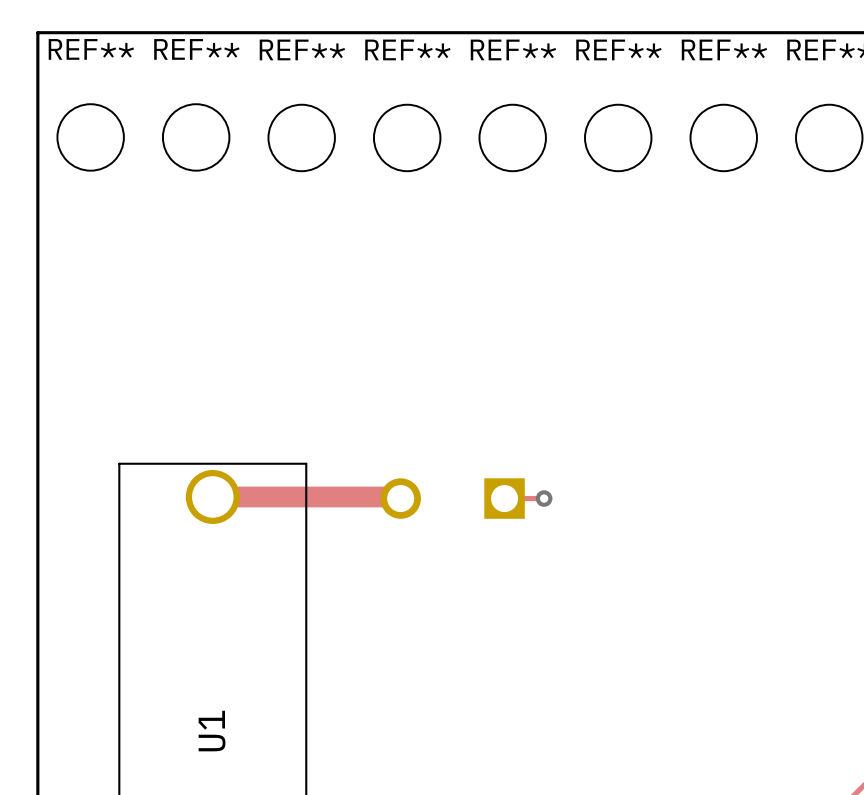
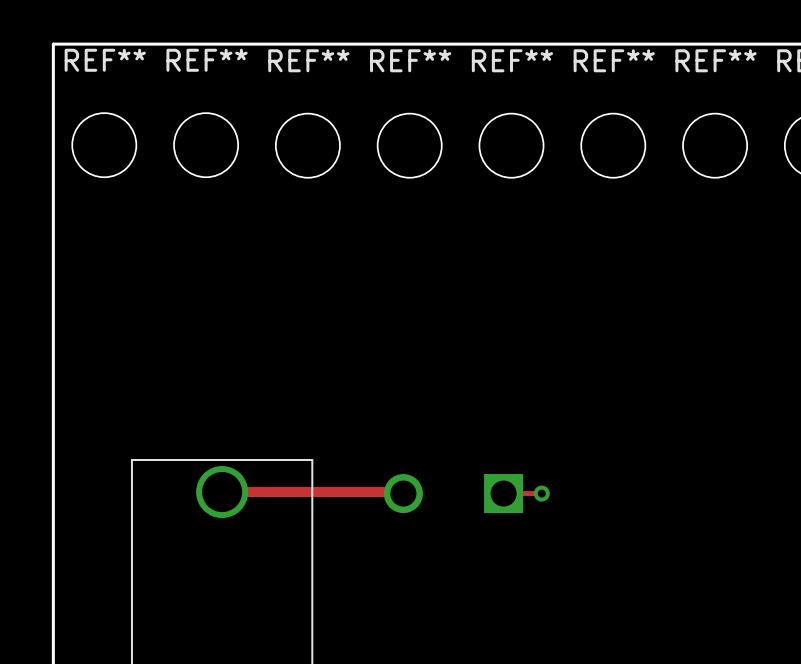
track width: thick (212, 496) (399, 496) (400, 498) -> thin (222, 492) (401, 492) (403, 493)

